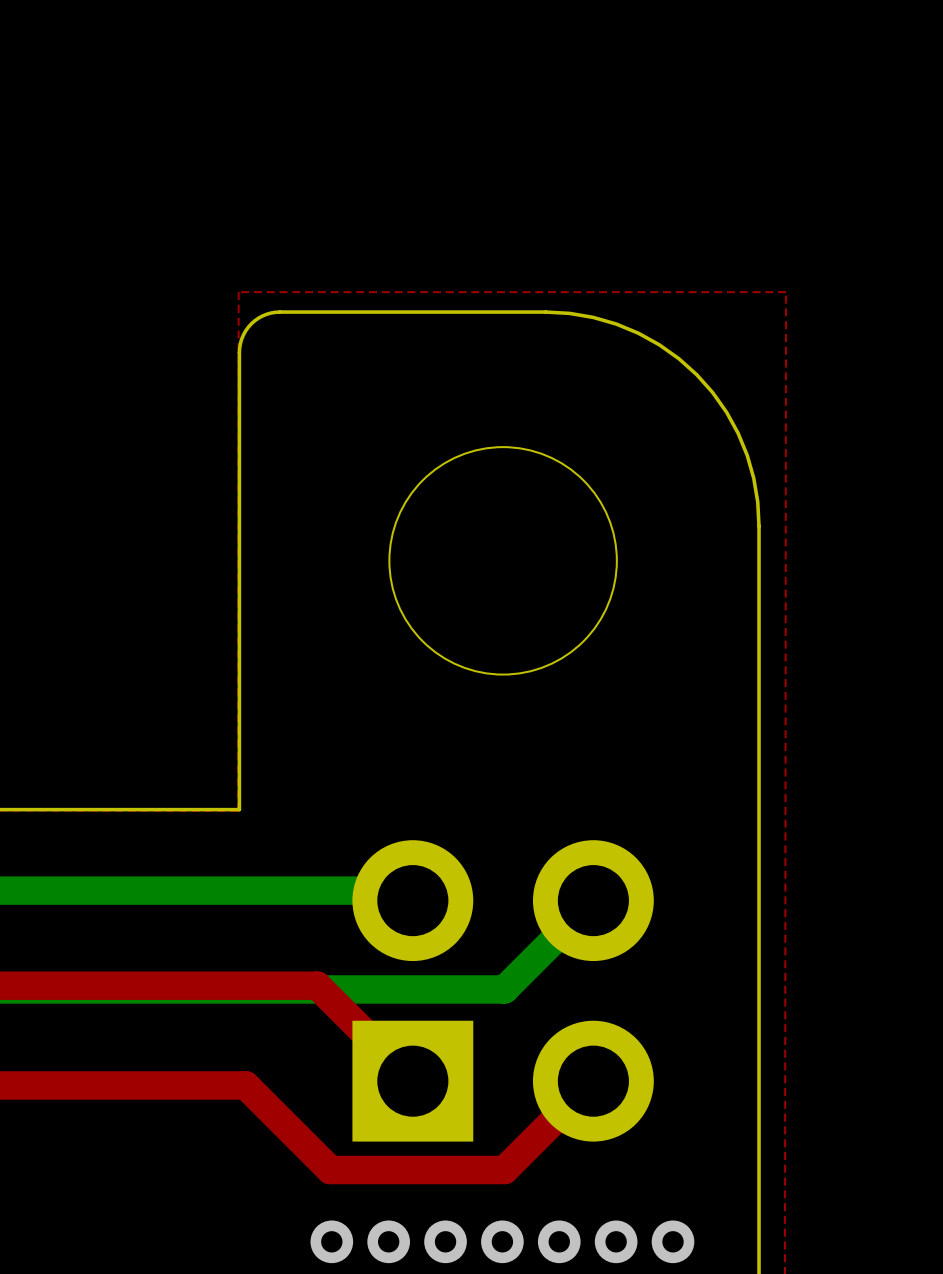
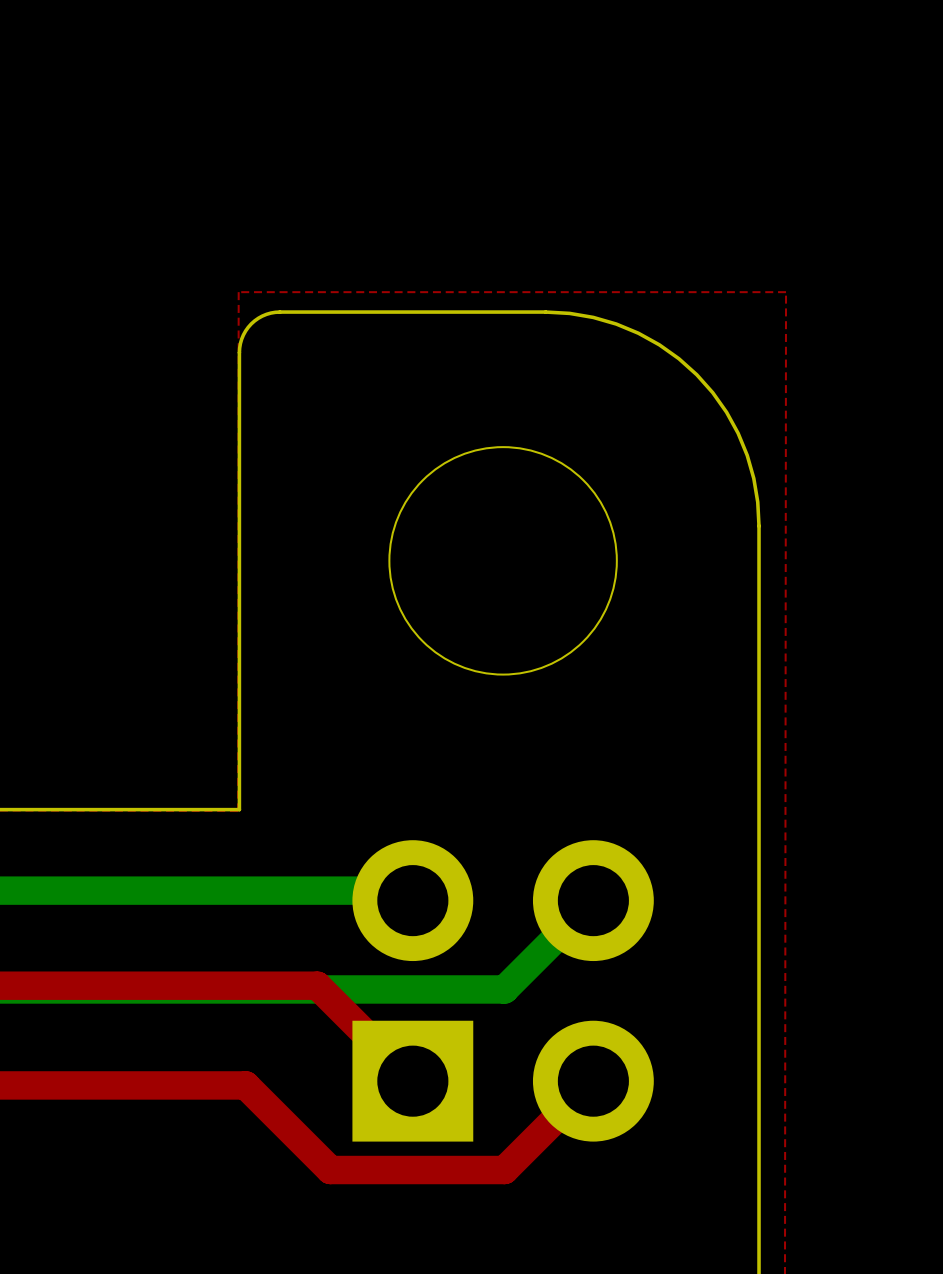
via: (331, 1241) -> none
via: (388, 1241) -> none
via: (445, 1241) -> none
via: (502, 1241) -> none
via: (559, 1241) -> none
via: (616, 1241) -> none
via: (673, 1241) -> none

